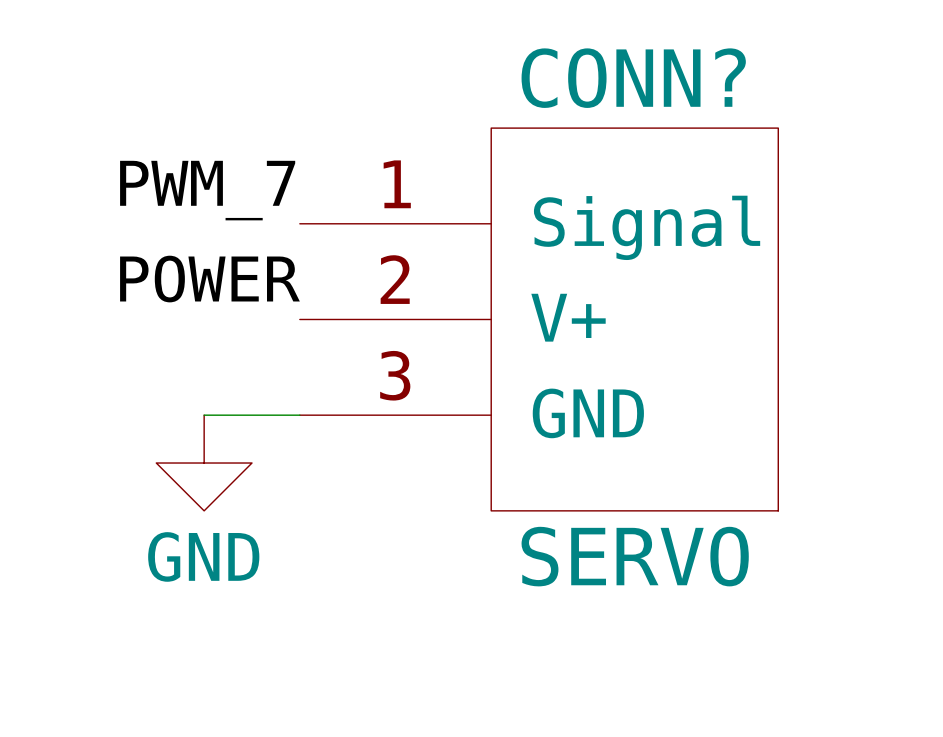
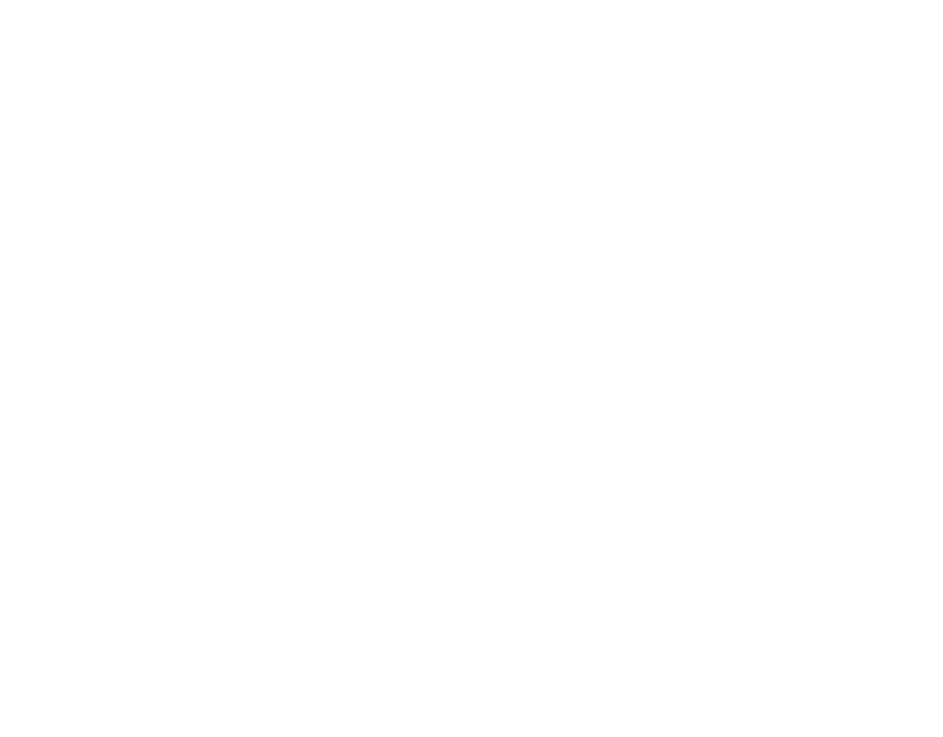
label: PWM_7 (207, 190) -> none
label: POWER (209, 279) -> none
CONN?: SERVO (539, 319) -> none
wire: (204, 415) (299, 415) -> none
power symbol: GND (204, 463) -> none

